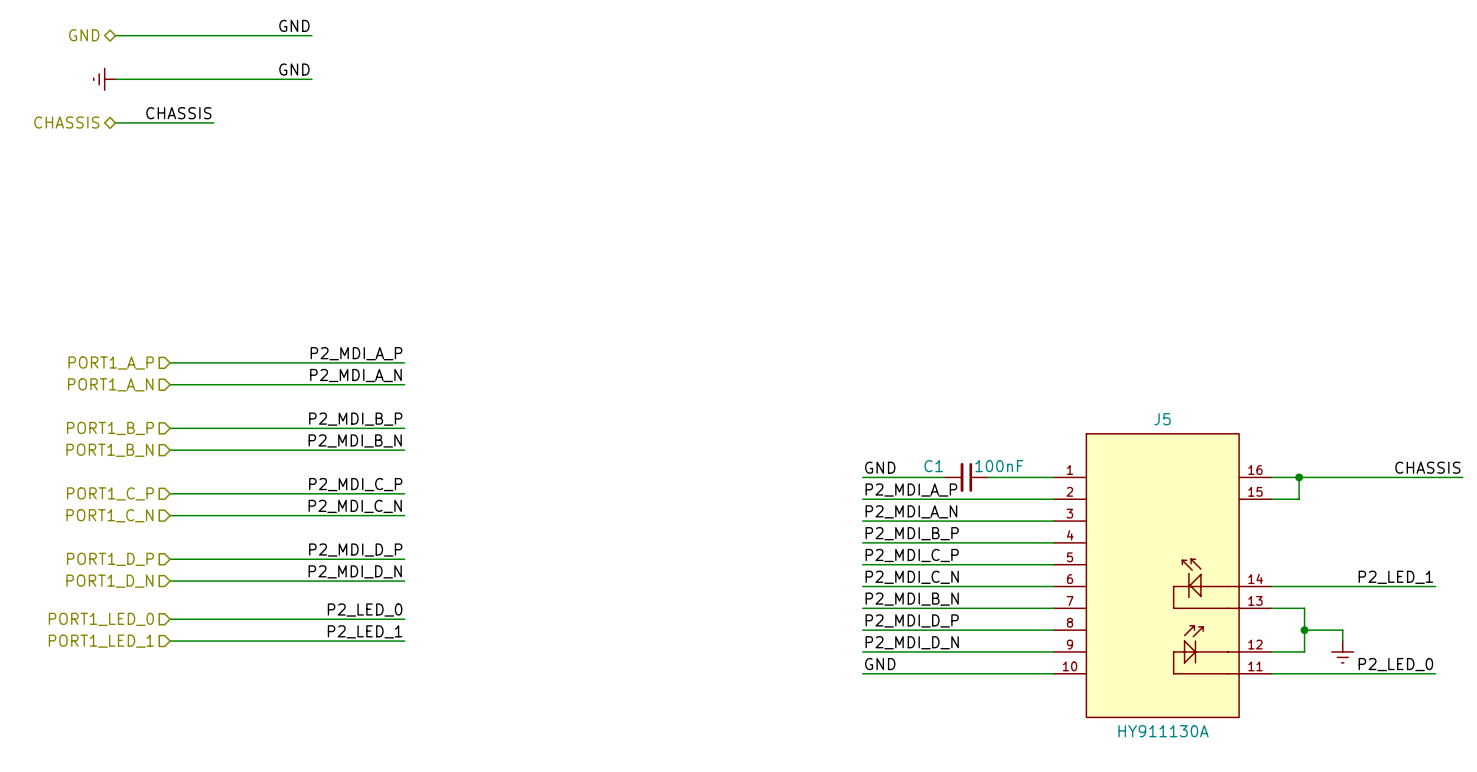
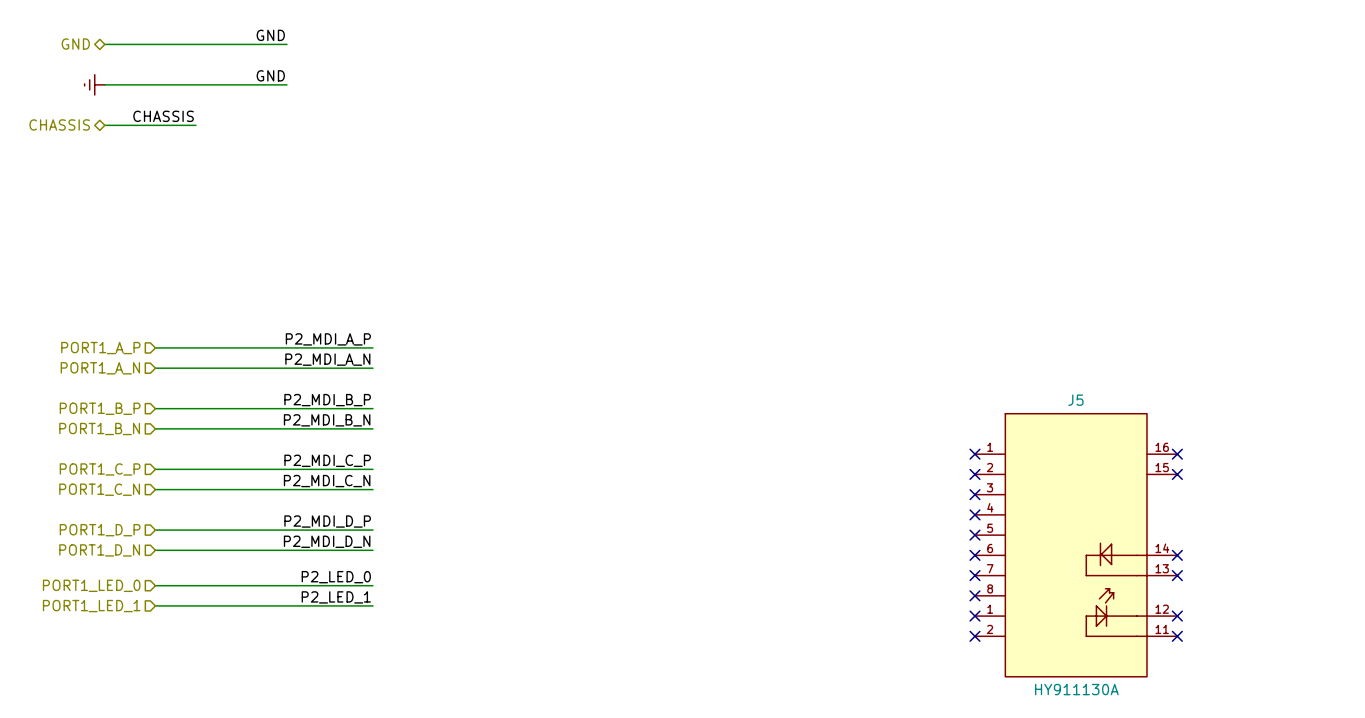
J5 symbol: [1053, 433, 1272, 718] -> [974, 413, 1178, 677]
label: GND (880, 467) -> none
label: CHASSIS (1427, 467) -> none
wire: (862, 477) (944, 477) -> none
C1: 100nF (966, 477) -> none
wire: (988, 477) (1053, 477) -> none
no-connect mark: none -> (974, 454)
wire: (1271, 477) (1462, 477) -> none
no-connect mark: none -> (1177, 454)
wire: (1299, 477) (1299, 499) (1271, 499) -> none
junction: (1299, 477) -> none
label: P2_MDI_A_P (911, 490) -> none
wire: (862, 499) (1053, 499) -> none
no-connect mark: none -> (974, 474)
no-connect mark: none -> (1177, 474)
label: P2_MDI_A_N (911, 511) -> none
wire: (862, 521) (1053, 521) -> none
no-connect mark: none -> (974, 494)
label: P2_MDI_B_P (912, 533) -> none
wire: (862, 542) (1053, 542) -> none
no-connect mark: none -> (974, 514)
label: P2_MDI_C_P (912, 555) -> none
wire: (862, 564) (1053, 564) -> none
no-connect mark: none -> (974, 535)
label: P2_MDI_C_N (912, 577) -> none
label: P2_LED_1 (1395, 577) -> none
wire: (862, 586) (1053, 586) -> none
no-connect mark: none -> (974, 555)
wire: (1271, 586) (1435, 586) -> none
no-connect mark: none -> (1177, 555)
label: P2_MDI_B_N (912, 599) -> none
wire: (862, 608) (1053, 608) -> none
no-connect mark: none -> (974, 575)
wire: (1271, 608) (1304, 608) (1304, 651) (1271, 651) -> none
no-connect mark: none -> (1177, 575)
label: P2_MDI_D_P (912, 620) -> none
wire: (862, 630) (1053, 630) -> none
no-connect mark: none -> (974, 595)
wire: (1304, 630) (1342, 630) (1342, 641) -> none
junction: (1304, 630) -> none
label: P2_MDI_D_N (912, 642) -> none
wire: (862, 651) (1053, 651) -> none
no-connect mark: none -> (974, 616)
no-connect mark: none -> (1177, 616)
power symbol: (1342, 651) -> none
label: GND (880, 664) -> none
label: P2_LED_0 (1395, 664) -> none
wire: (862, 673) (1053, 673) -> none
no-connect mark: none -> (974, 636)
wire: (1271, 673) (1435, 673) -> none
no-connect mark: none -> (1177, 636)

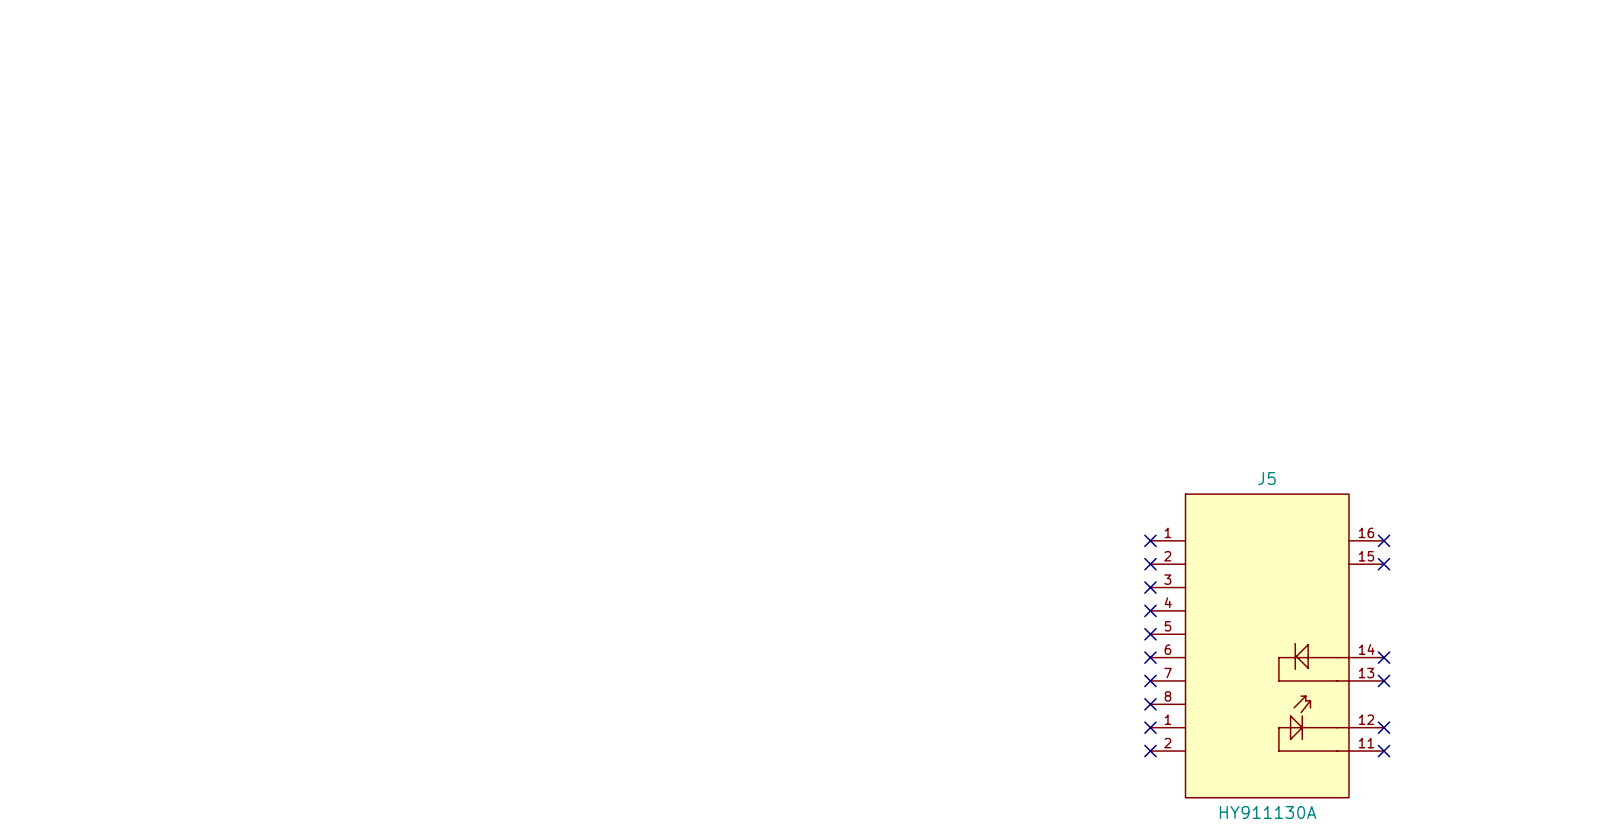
label: GND (270, 35) -> none
hierarchical label: GND (75, 44) -> none
wire: (104, 44) (286, 44) -> none
label: GND (270, 75) -> none
power symbol: (94, 84) -> none
wire: (104, 84) (286, 84) -> none
label: CHASSIS (163, 116) -> none
hierarchical label: CHASSIS (59, 124) -> none
wire: (104, 125) (195, 125) -> none
label: P2_MDI_A_P (328, 339) -> none
wire: (155, 347) (372, 347) -> none
hierarchical label: PORT1_A_P (100, 348) -> none
label: P2_MDI_A_N (327, 359) -> none
hierarchical label: PORT1_A_N (100, 368) -> none
wire: (155, 368) (372, 368) -> none
label: P2_MDI_B_P (327, 400) -> none
hierarchical label: PORT1_B_P (100, 408) -> none
wire: (155, 408) (372, 408) -> none
label: P2_MDI_B_N (327, 420) -> none
hierarchical label: PORT1_B_N (99, 428) -> none
wire: (155, 428) (372, 428) -> none
label: P2_MDI_C_P (327, 460) -> none
hierarchical label: PORT1_C_P (100, 469) -> none
wire: (155, 469) (372, 469) -> none
label: P2_MDI_C_N (327, 481) -> none
hierarchical label: PORT1_C_N (99, 489) -> none
wire: (155, 489) (372, 489) -> none
label: P2_MDI_D_P (327, 521) -> none
hierarchical label: PORT1_D_P (100, 530) -> none
wire: (155, 530) (372, 530) -> none
label: P2_MDI_D_N (327, 541) -> none
hierarchical label: PORT1_D_N (99, 550) -> none
wire: (155, 550) (372, 550) -> none
label: P2_LED_0 (336, 577) -> none
hierarchical label: PORT1_LED_0 (91, 585) -> none
wire: (155, 585) (372, 585) -> none
label: P2_LED_1 (336, 597) -> none
wire: (155, 605) (372, 605) -> none
hierarchical label: PORT1_LED_1 (91, 606) -> none

